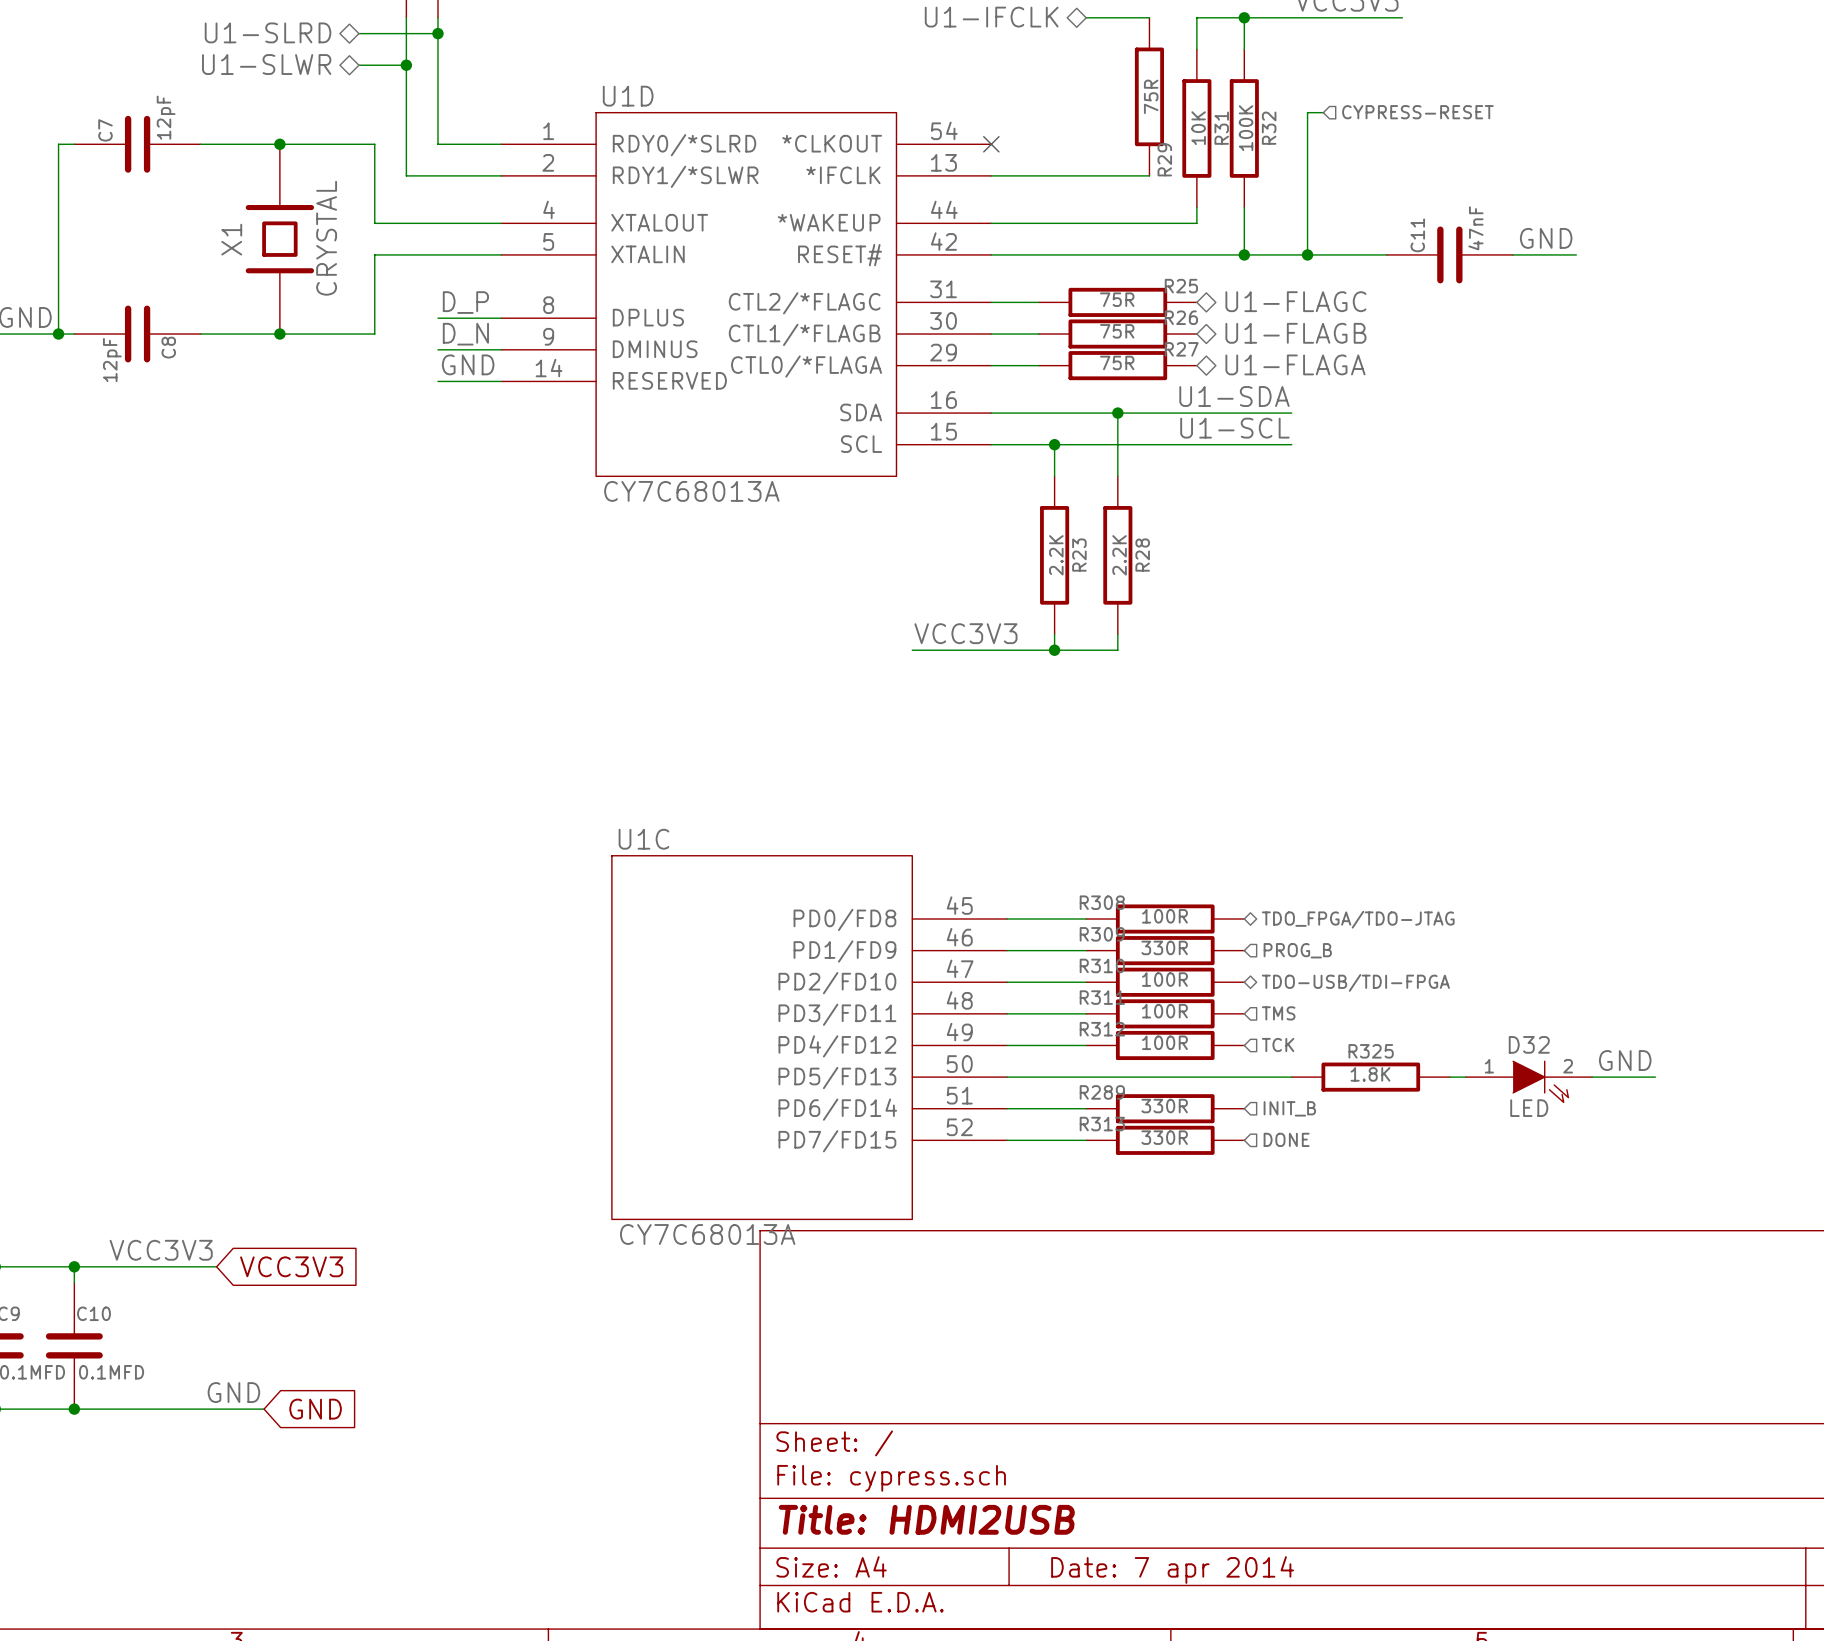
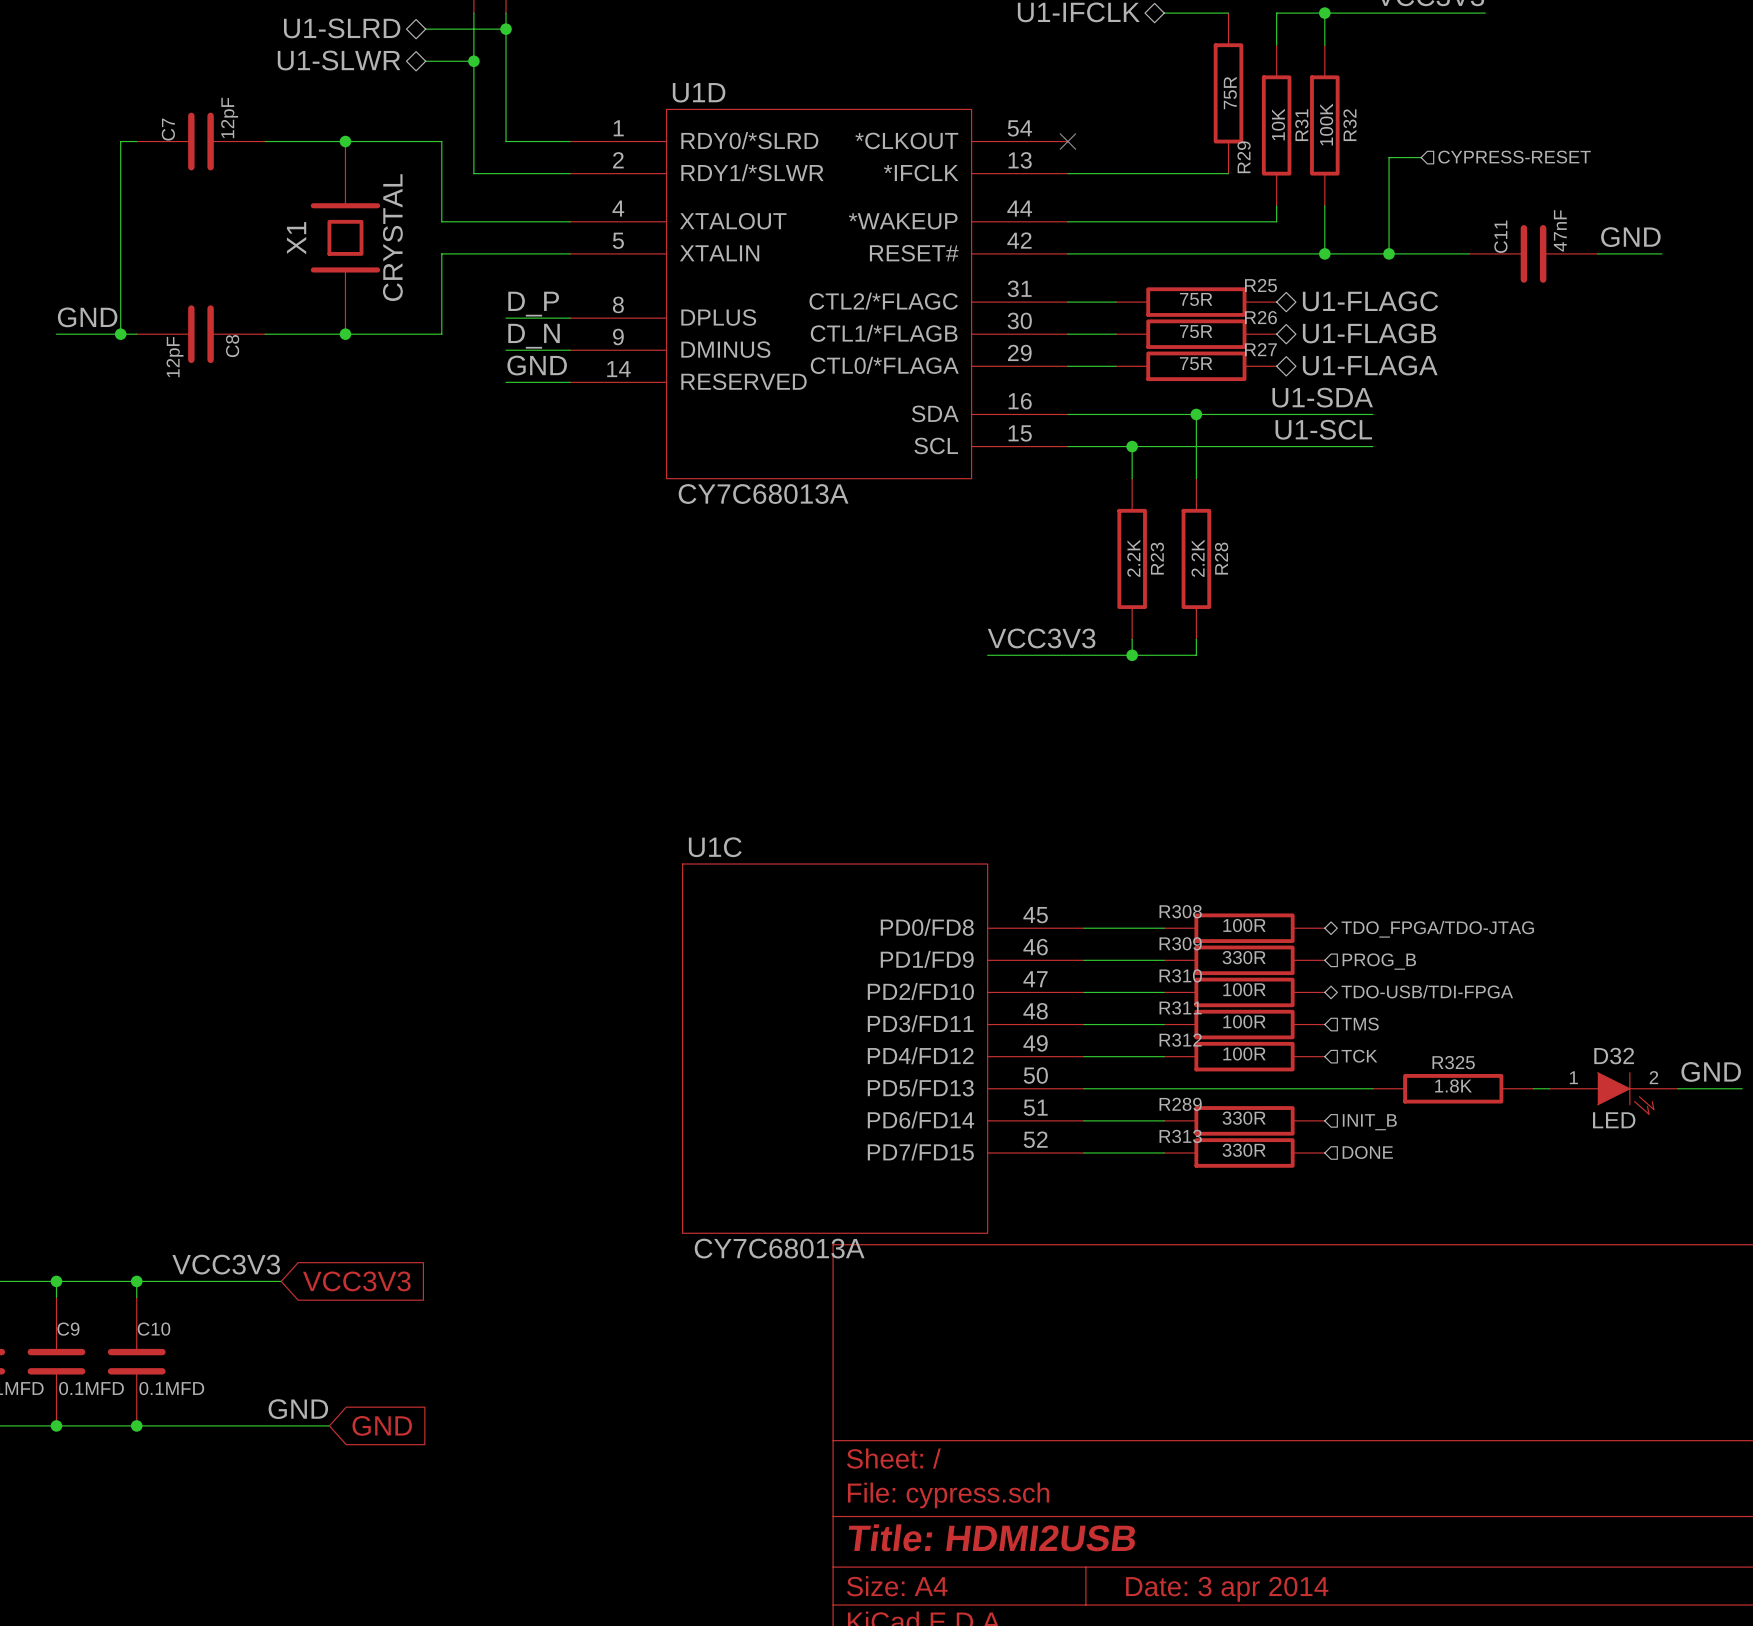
wire: (1323, 112) (1307, 112) (1307, 160) -> (1421, 157) (1389, 157)
hierarchical label position: CYPRESS-RESET (1417, 112) -> CYPRESS-RESET (1514, 157)
title block: Date: 7 apr 2014 (1172, 1570) -> Date: 3 apr 2014 (1227, 1589)

